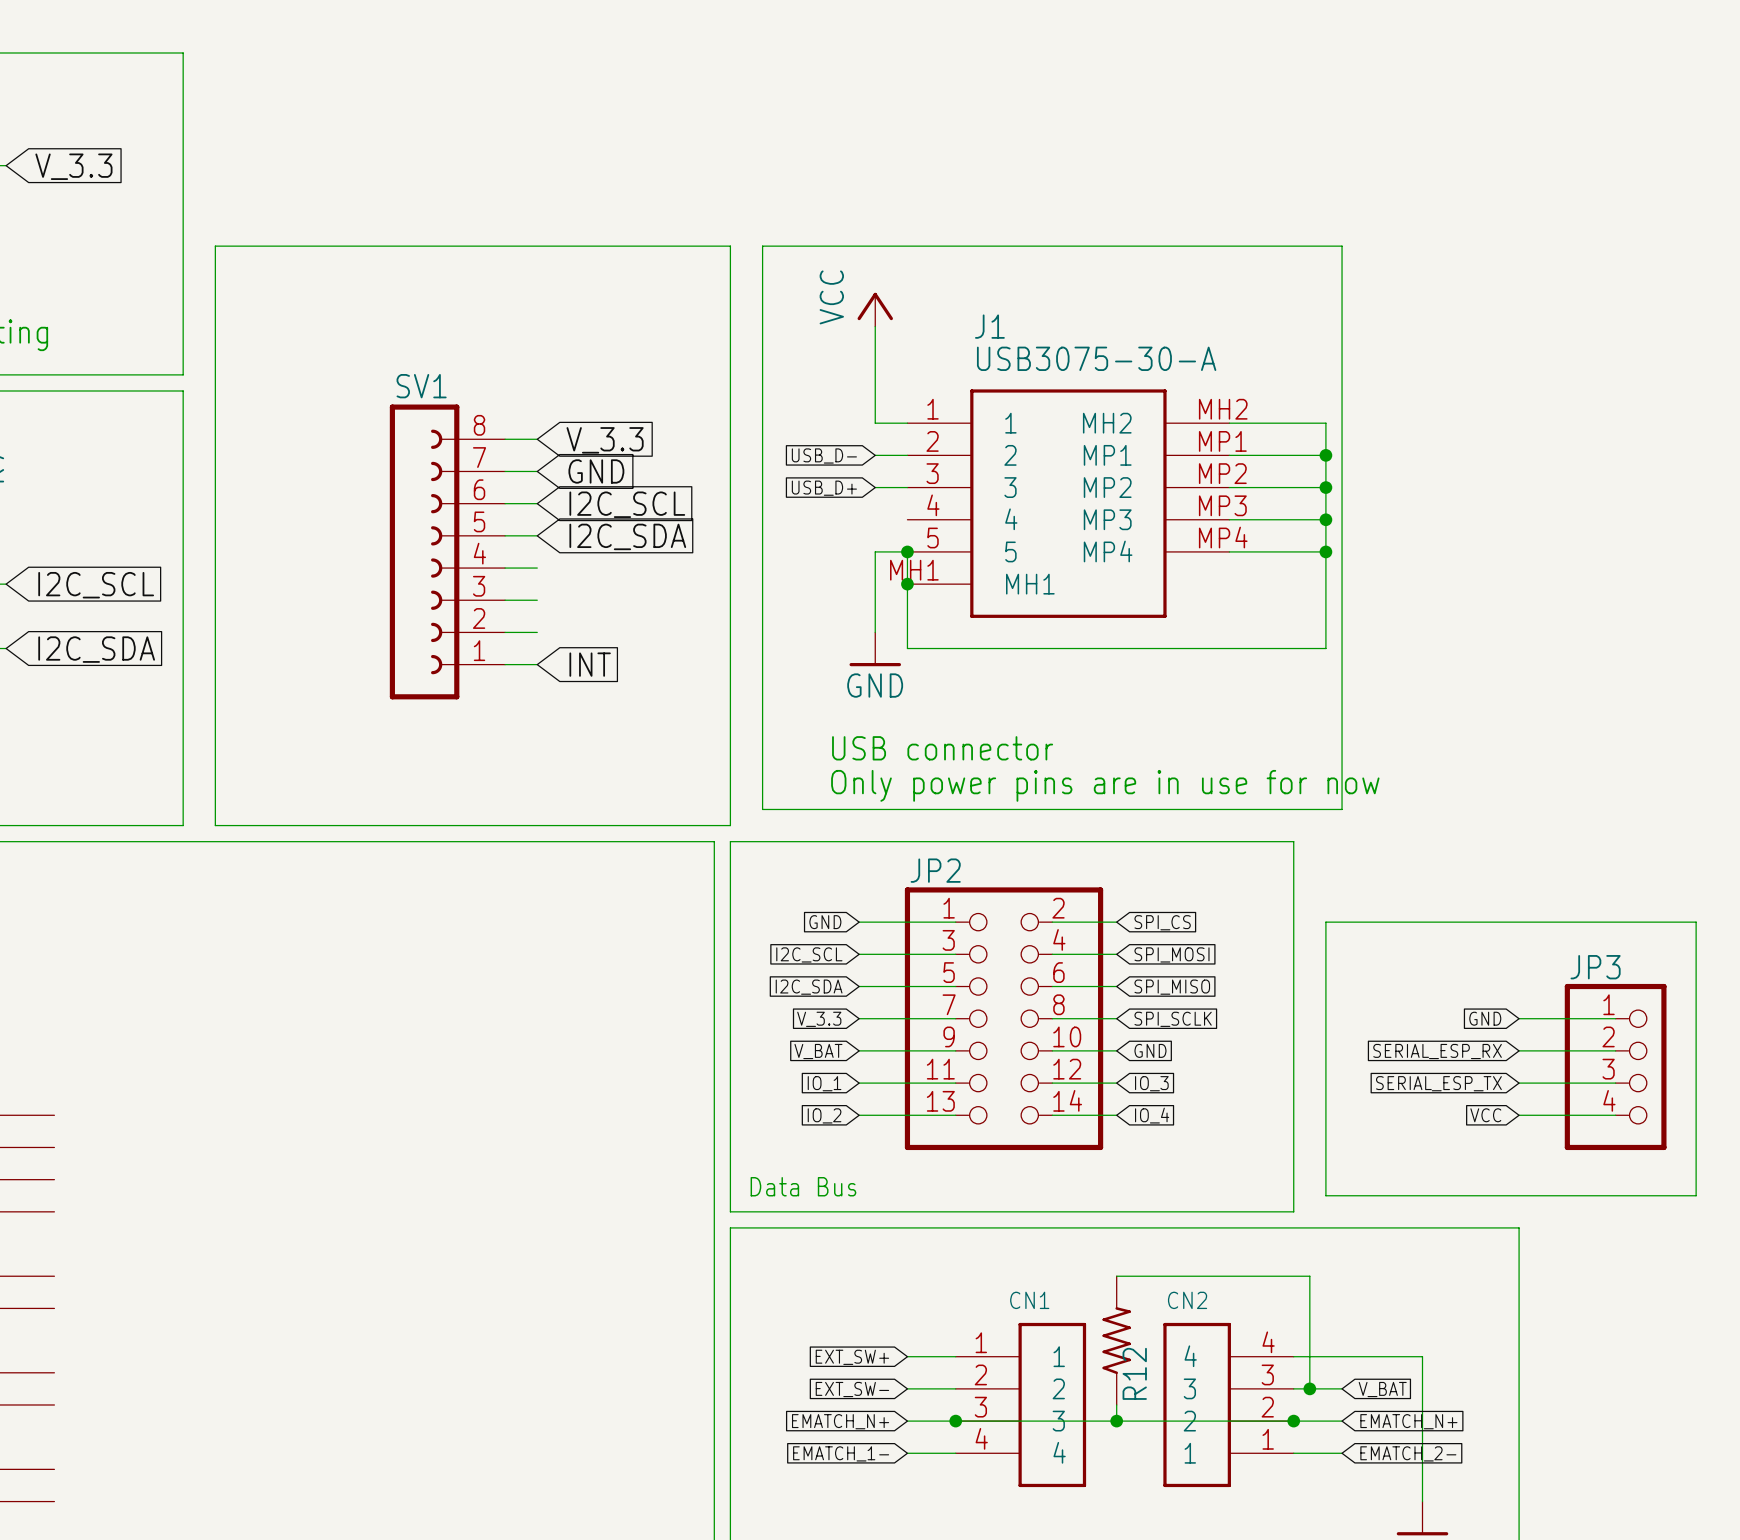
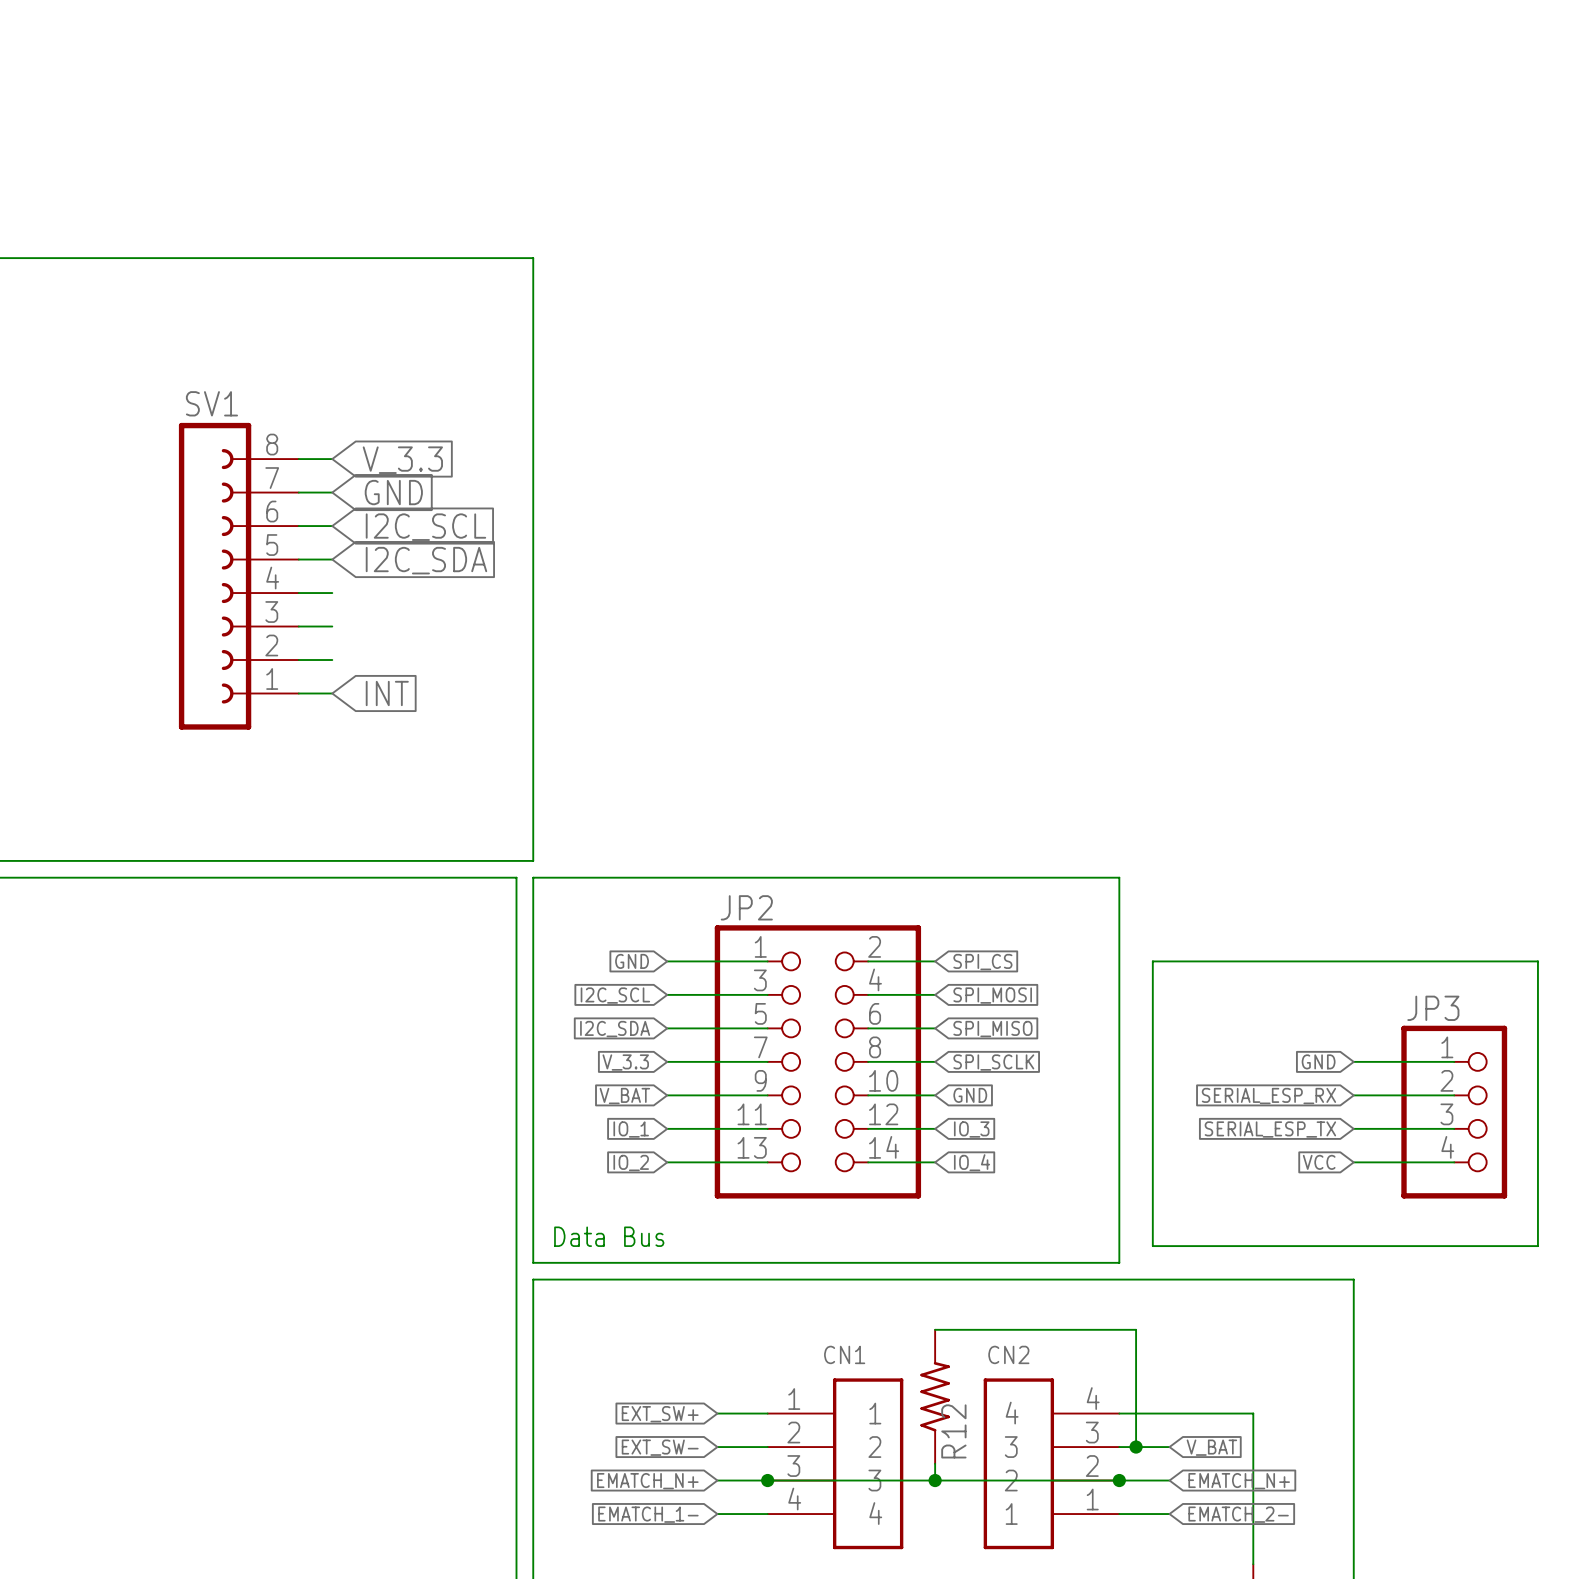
wire: (762, 246) (1342, 246) (1342, 809) (762, 809) (762, 246) -> none
power symbol: VCC (875, 309) -> none
wire: (875, 326) (875, 423) (907, 423) -> none
wire: (1229, 423) (1325, 423) (1325, 648) (907, 648) (907, 551) (875, 551) (875, 632) -> none
global label: USB_D- (824, 455) -> none
wire: (875, 455) (907, 455) -> none
wire: (1229, 455) (1325, 455) -> none
junction: (1325, 455) -> none
wire: (875, 487) (907, 487) -> none
wire: (1229, 487) (1325, 487) -> none
junction: (1325, 487) -> none
global label: USB_D+ (824, 488) -> none
J1: USB3075-30-A (1068, 503) -> none
wire: (1229, 519) (1325, 519) -> none
junction: (1325, 519) -> none
junction: (907, 551) -> none
wire: (1229, 551) (1325, 551) -> none
junction: (1325, 551) -> none
junction: (907, 584) -> none
power symbol: GND (875, 649) -> none
text: USB connector (942, 748) -> none
text: Only power pins are in use for now (1105, 785) -> none

